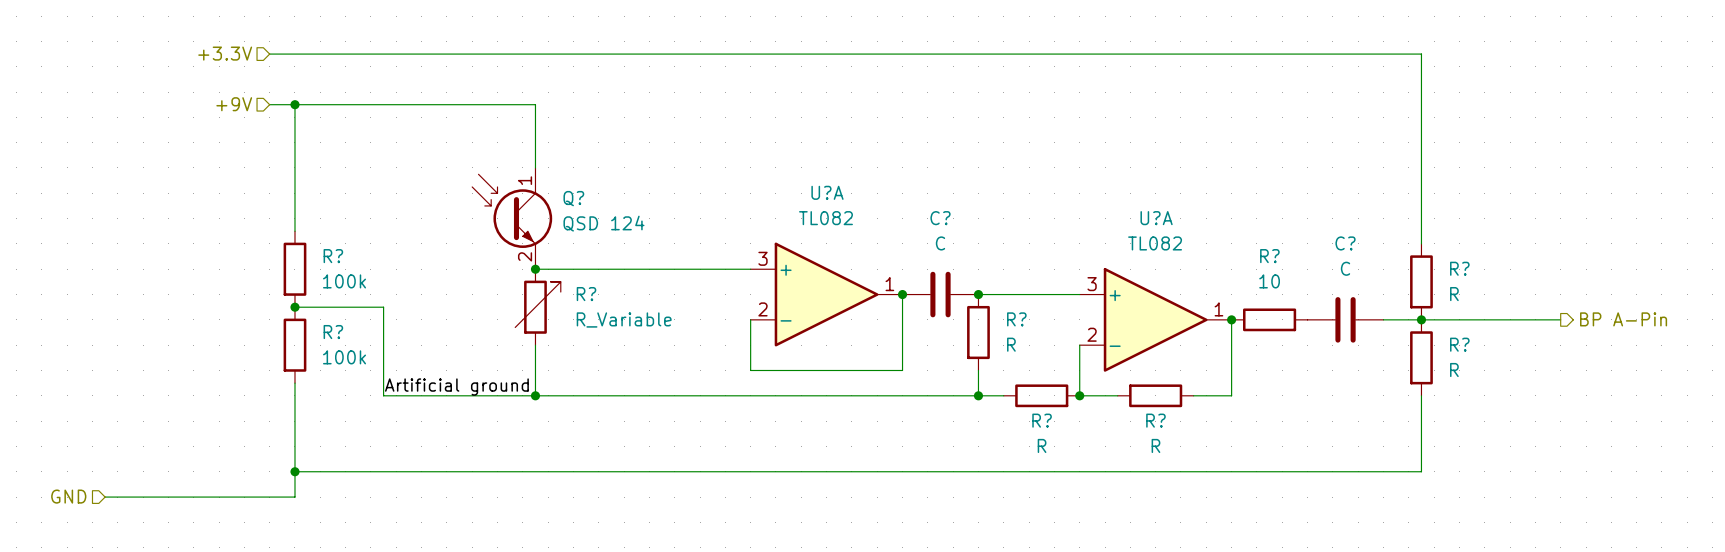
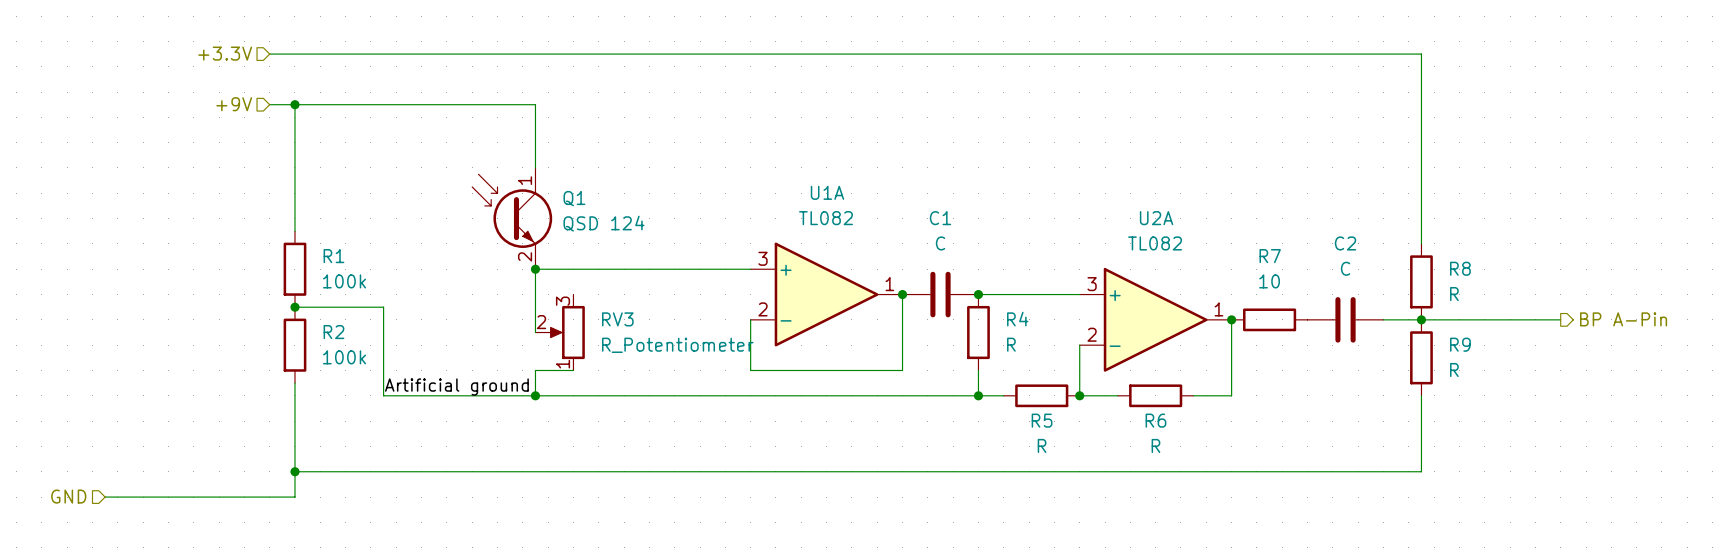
U?A name: U?A (827, 192) -> U1A (827, 192)
Q? name: Q? (573, 198) -> Q1 (574, 198)
C? name: C? (940, 218) -> C1 (940, 218)
U?A name: U?A (1156, 218) -> U2A (1156, 218)
C? name: C? (1345, 243) -> C2 (1345, 243)
R? name: R? (333, 256) -> R1 (333, 256)
R? name: R? (1269, 256) -> R7 (1270, 256)
R? name: R? (1459, 268) -> R8 (1460, 268)
wire: none -> (535, 269) (535, 332)
R?: R_Variable (538, 307) -> none
R? name: R? (1016, 319) -> R4 (1017, 319)
R? name: R? (333, 332) -> R2 (333, 332)
RV3: none -> R_Potentiometer (560, 332)
R? name: R? (1459, 344) -> R9 (1460, 344)
wire: (535, 345) (535, 370) -> (573, 370) (535, 370)
R? name: R? (1042, 420) -> R5 (1042, 420)
R? name: R? (1155, 420) -> R6 (1155, 420)

